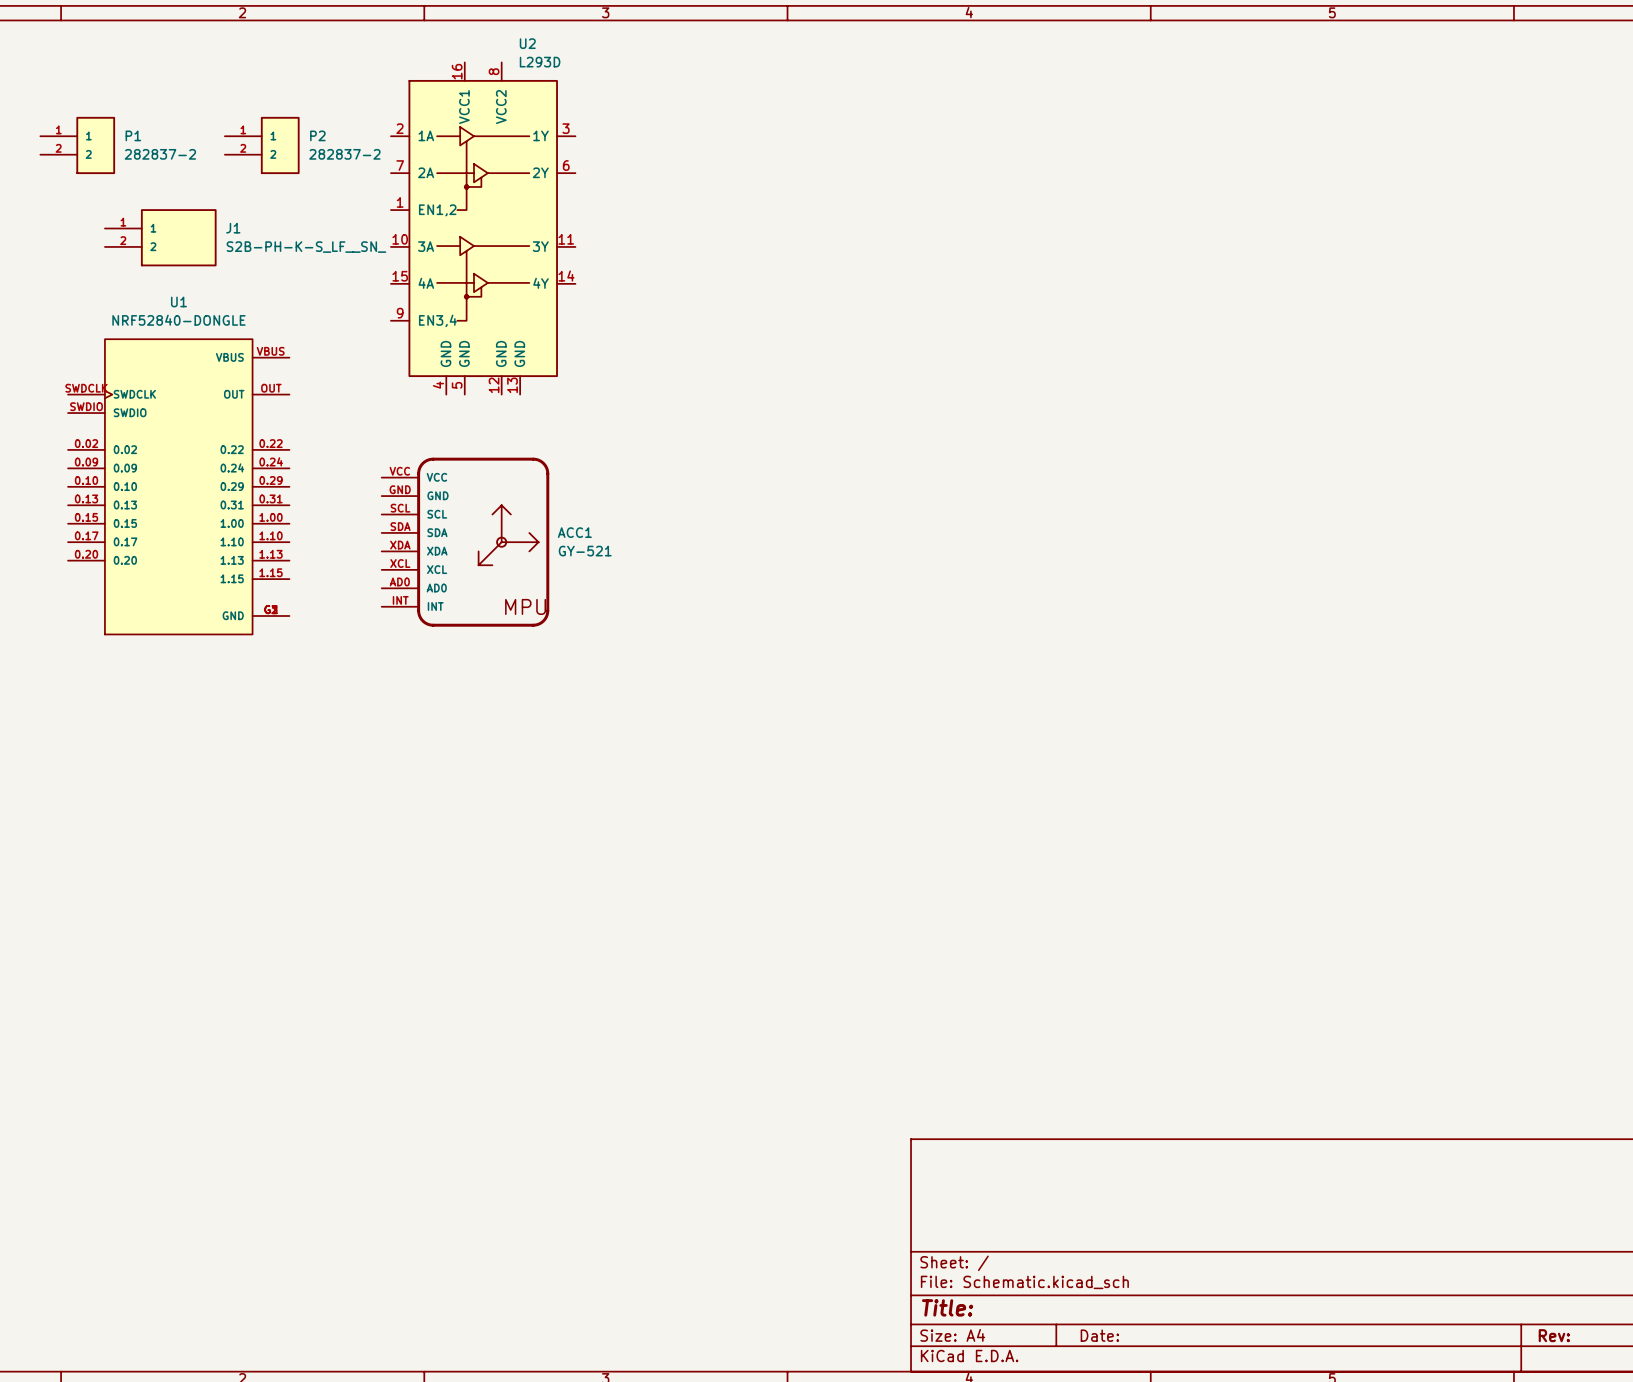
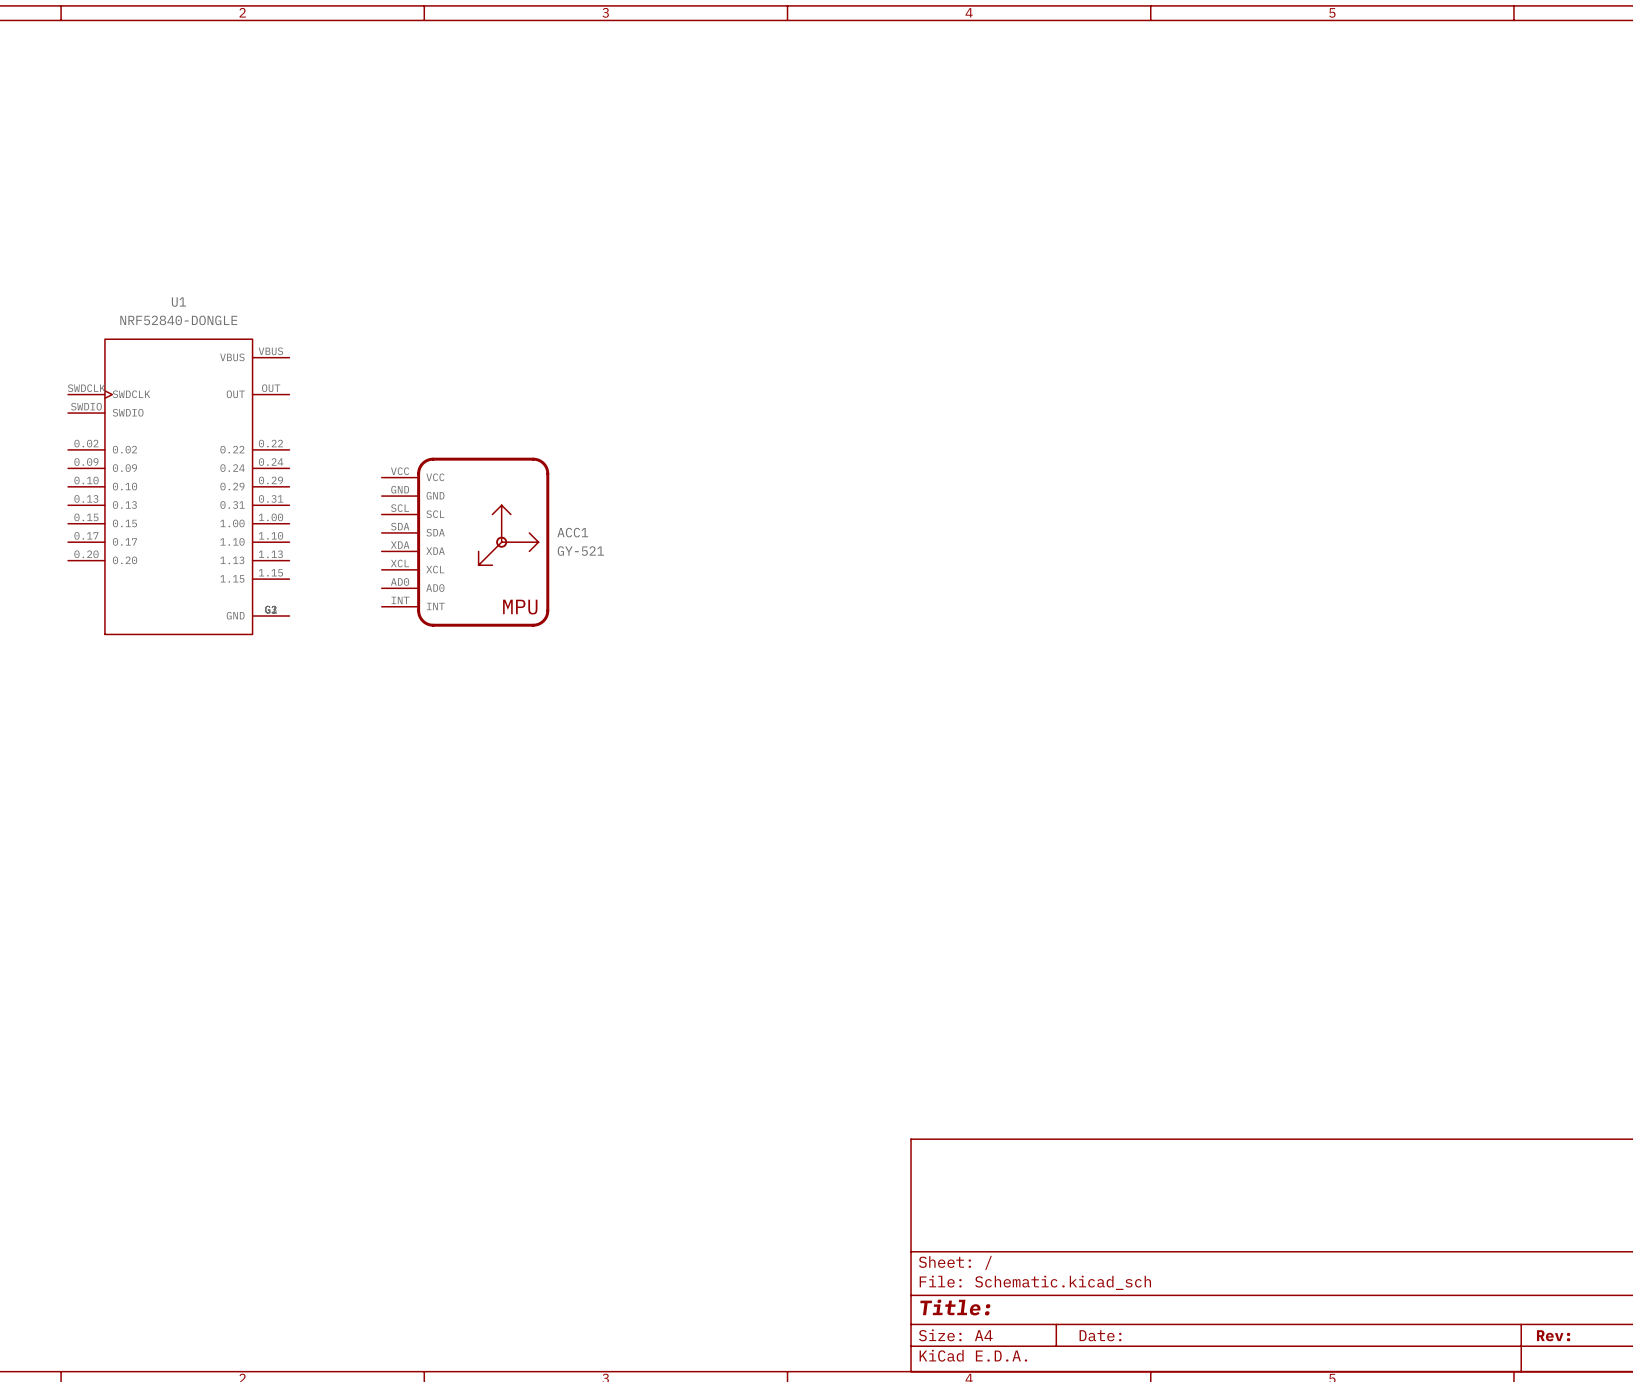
P1: 282837-2 (77, 145) -> none
P2: 282837-2 (262, 145) -> none
U2: L293D (483, 228) -> none
J1: S2B-PH-K-S_LF__SN_ (160, 237) -> none

